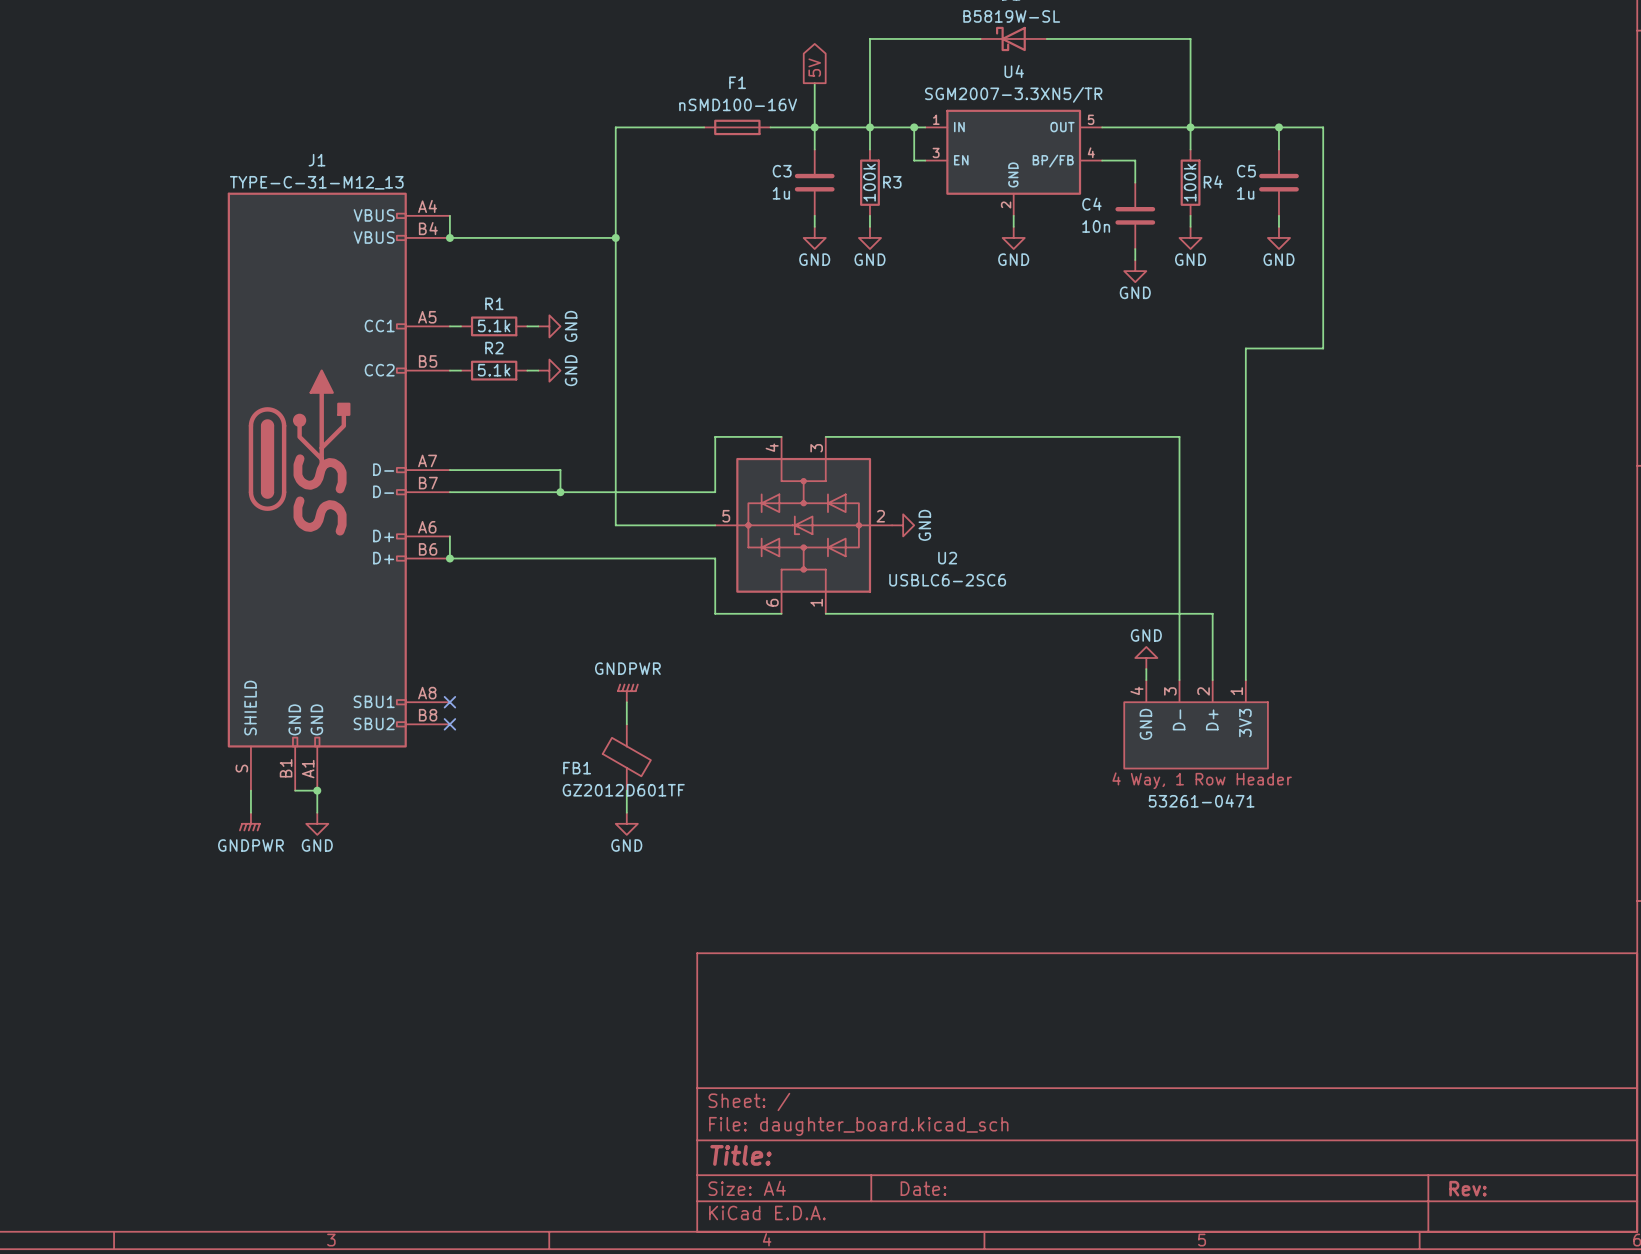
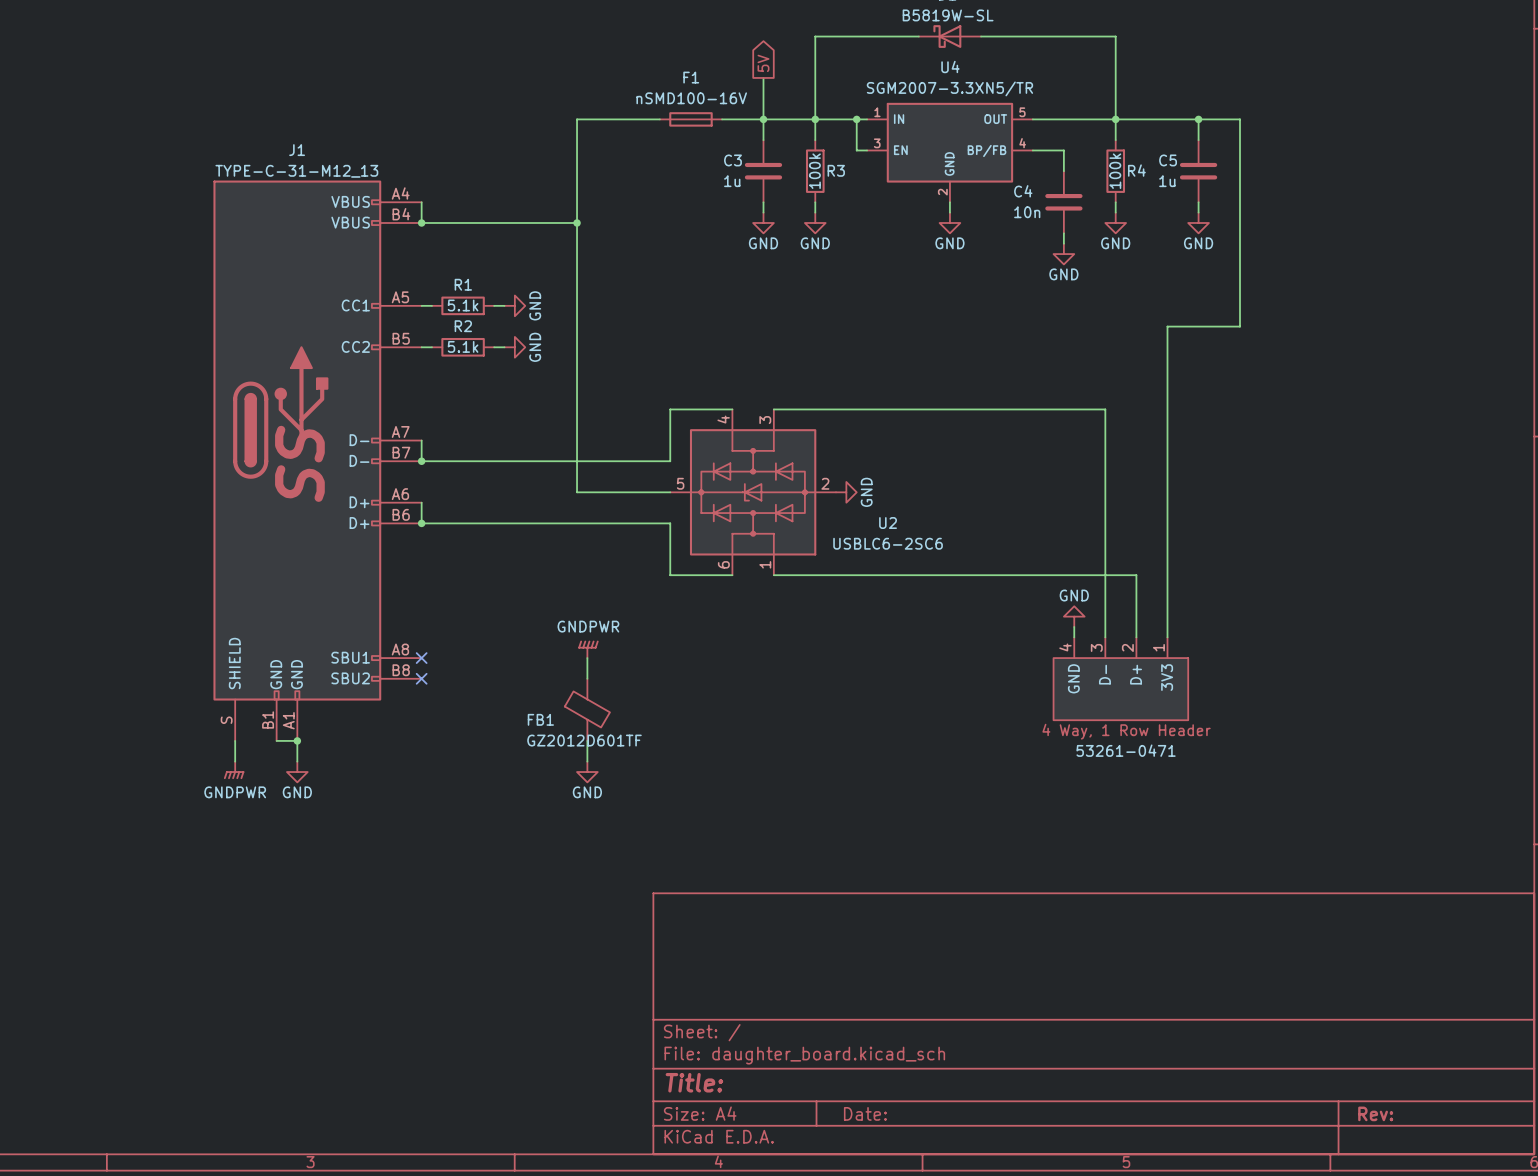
wire: (449, 470) (560, 470) (560, 492) -> (421, 440) (421, 461)
junction: none -> (421, 461)
junction: (560, 492) -> none

